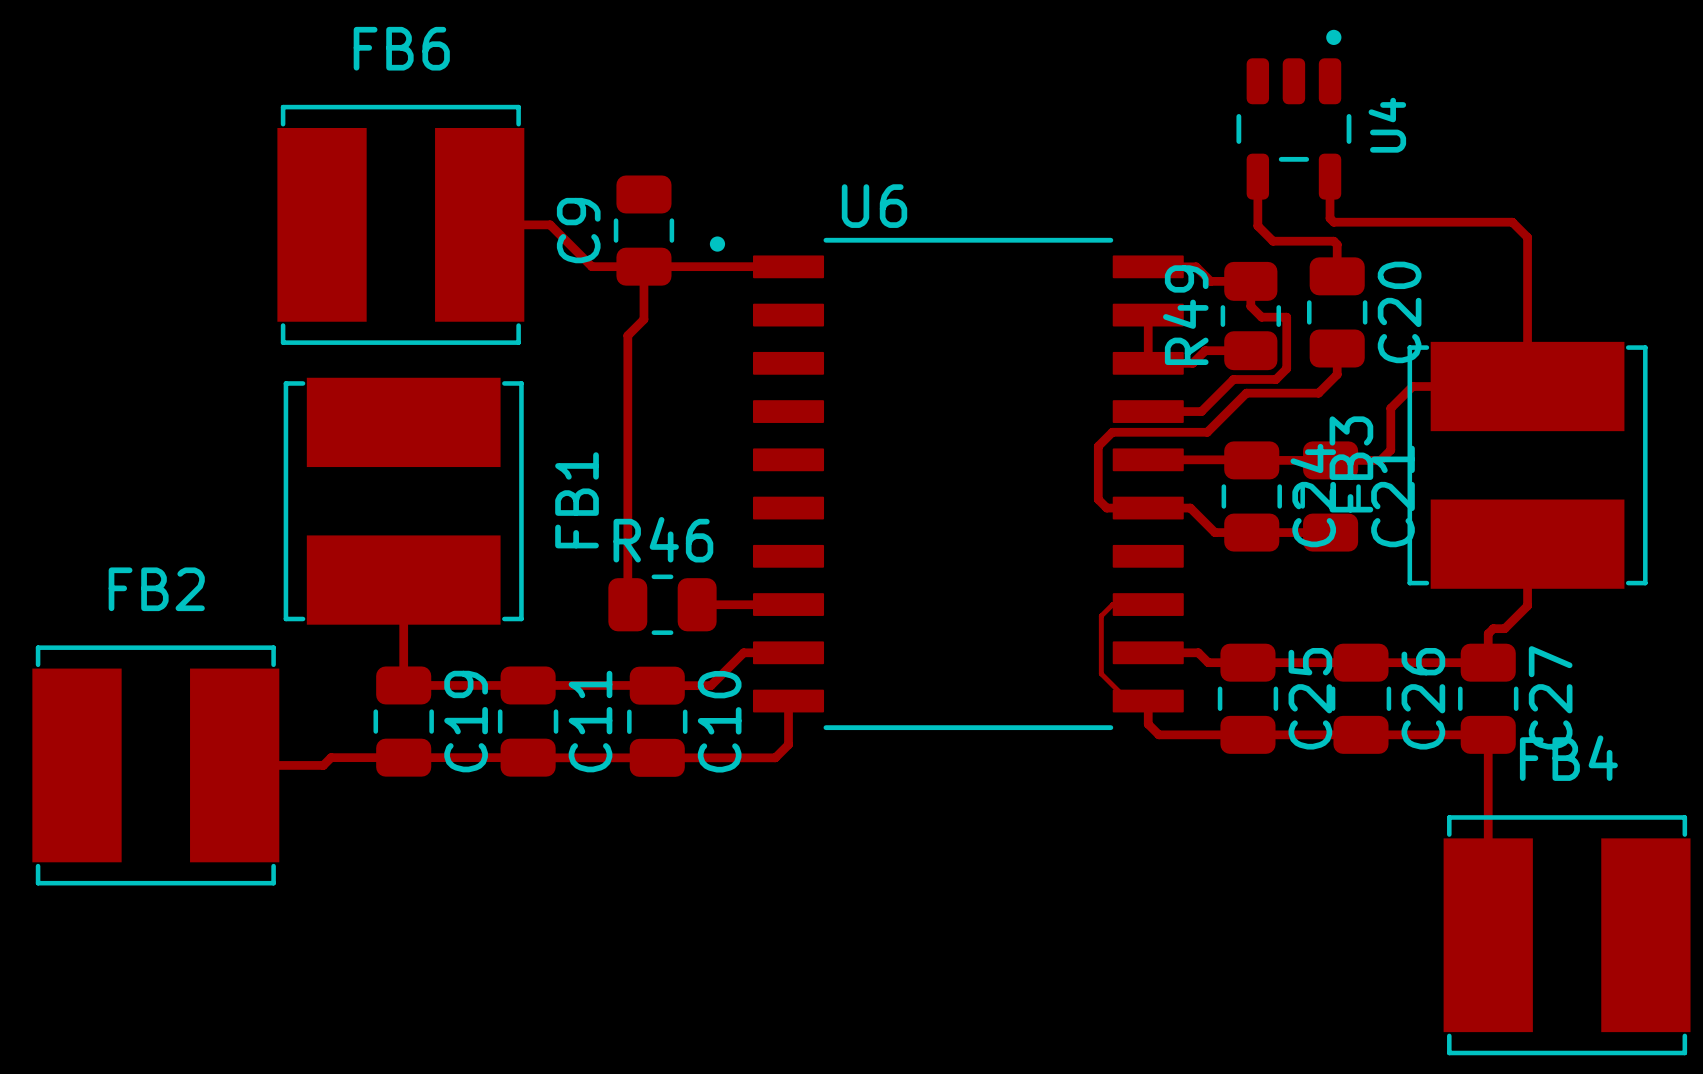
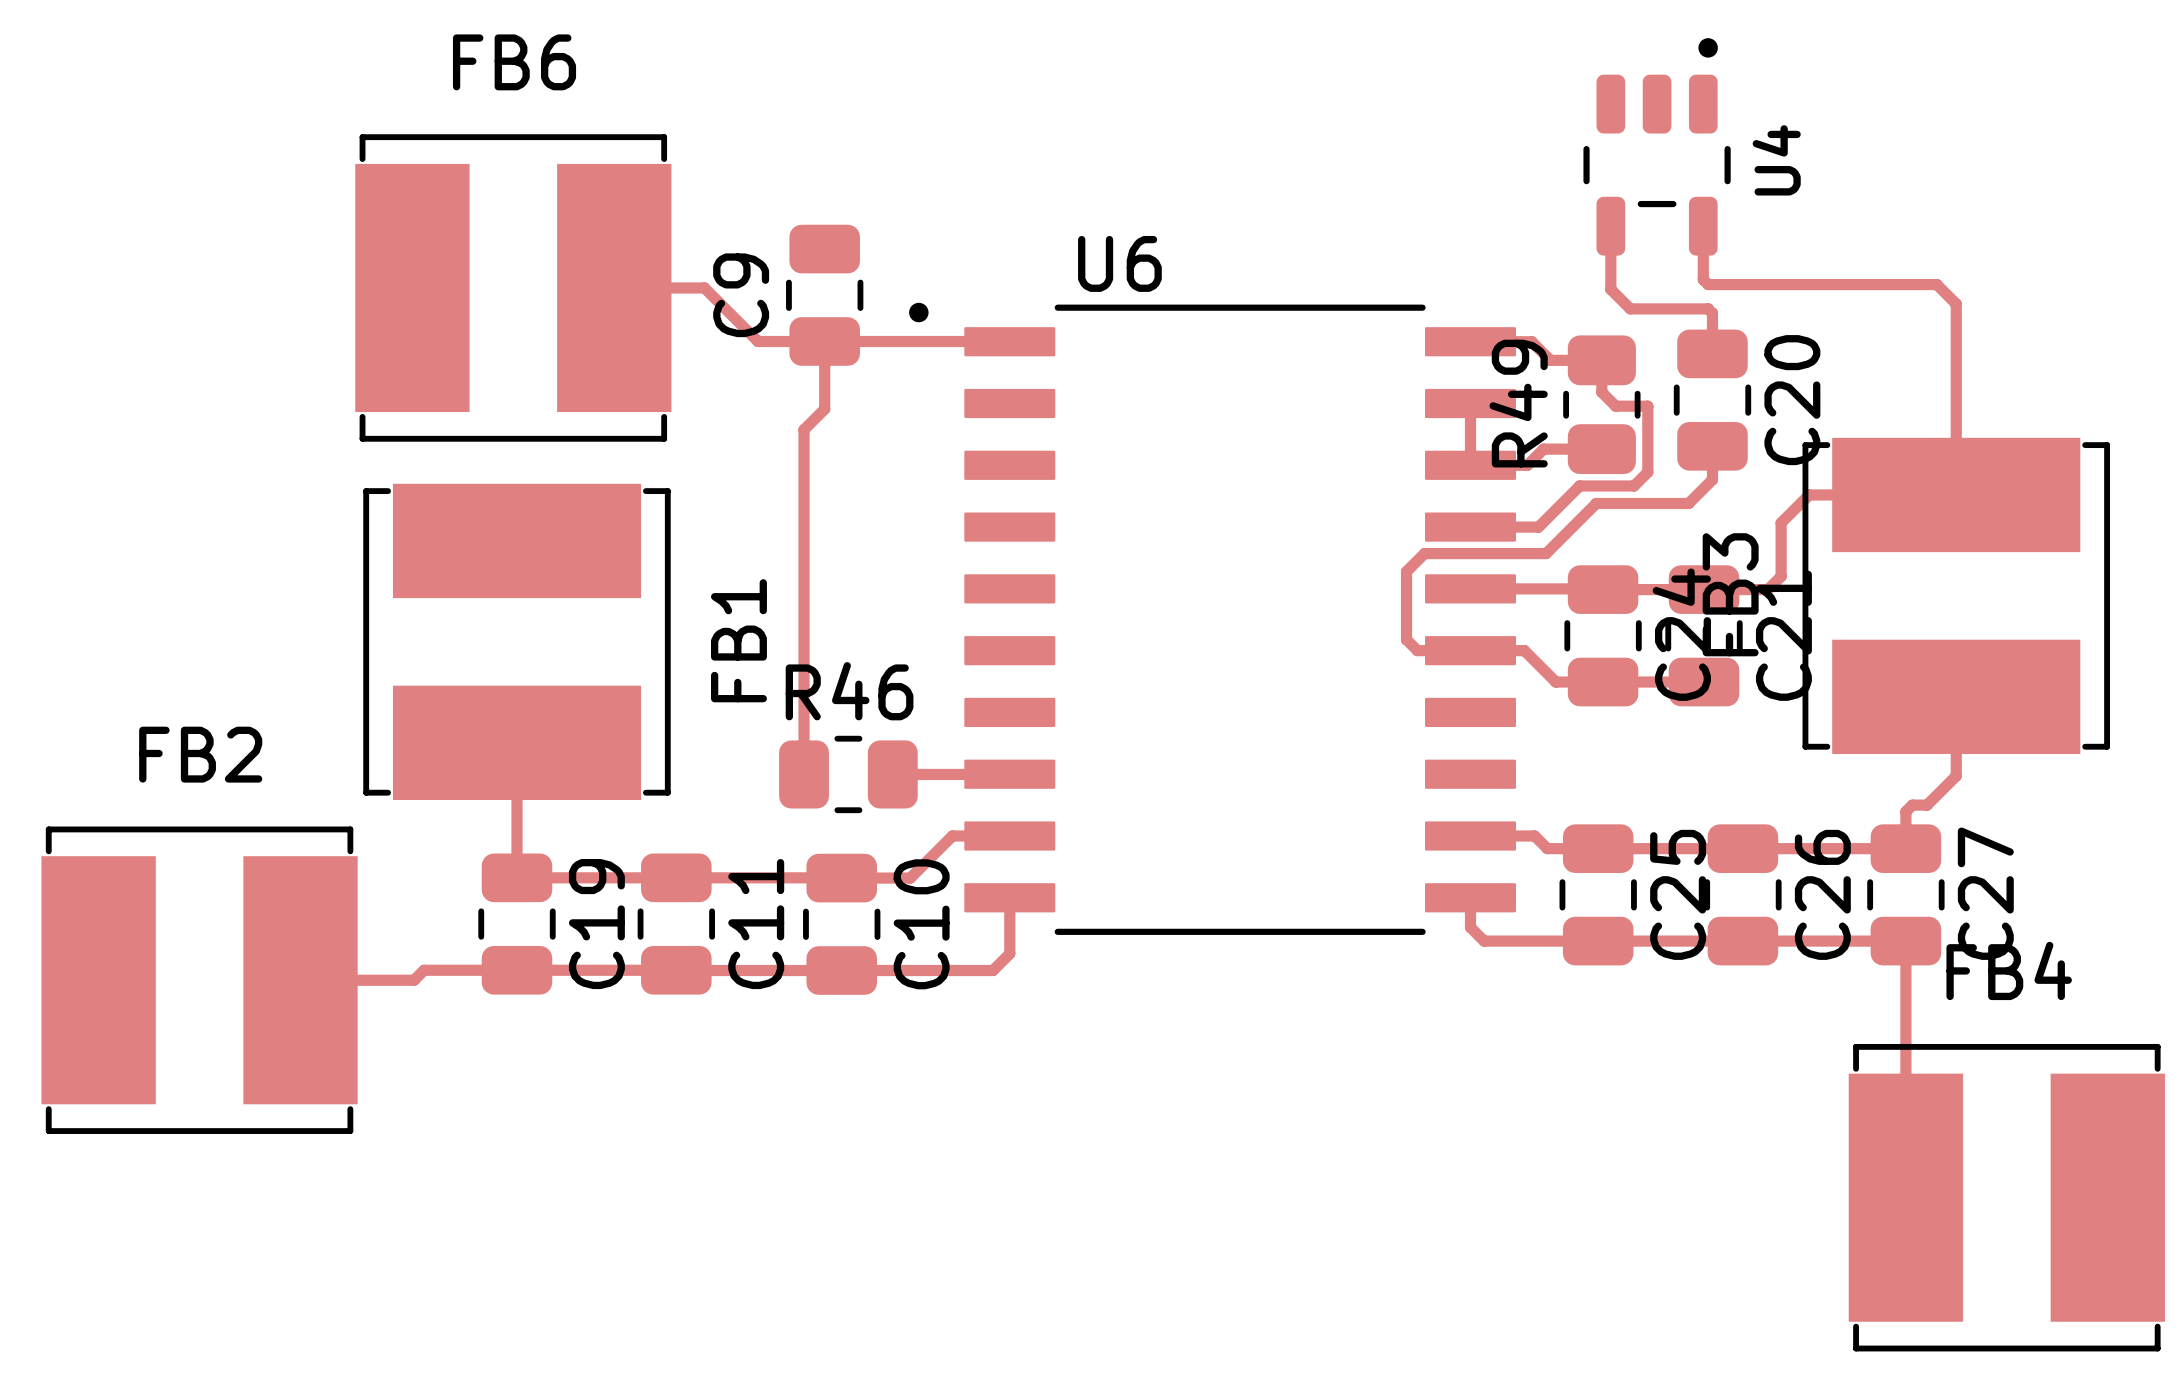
track: (1148, 604) (1112, 604) (1101, 615) (1101, 673) (1128, 701) (1148, 701) -> none

